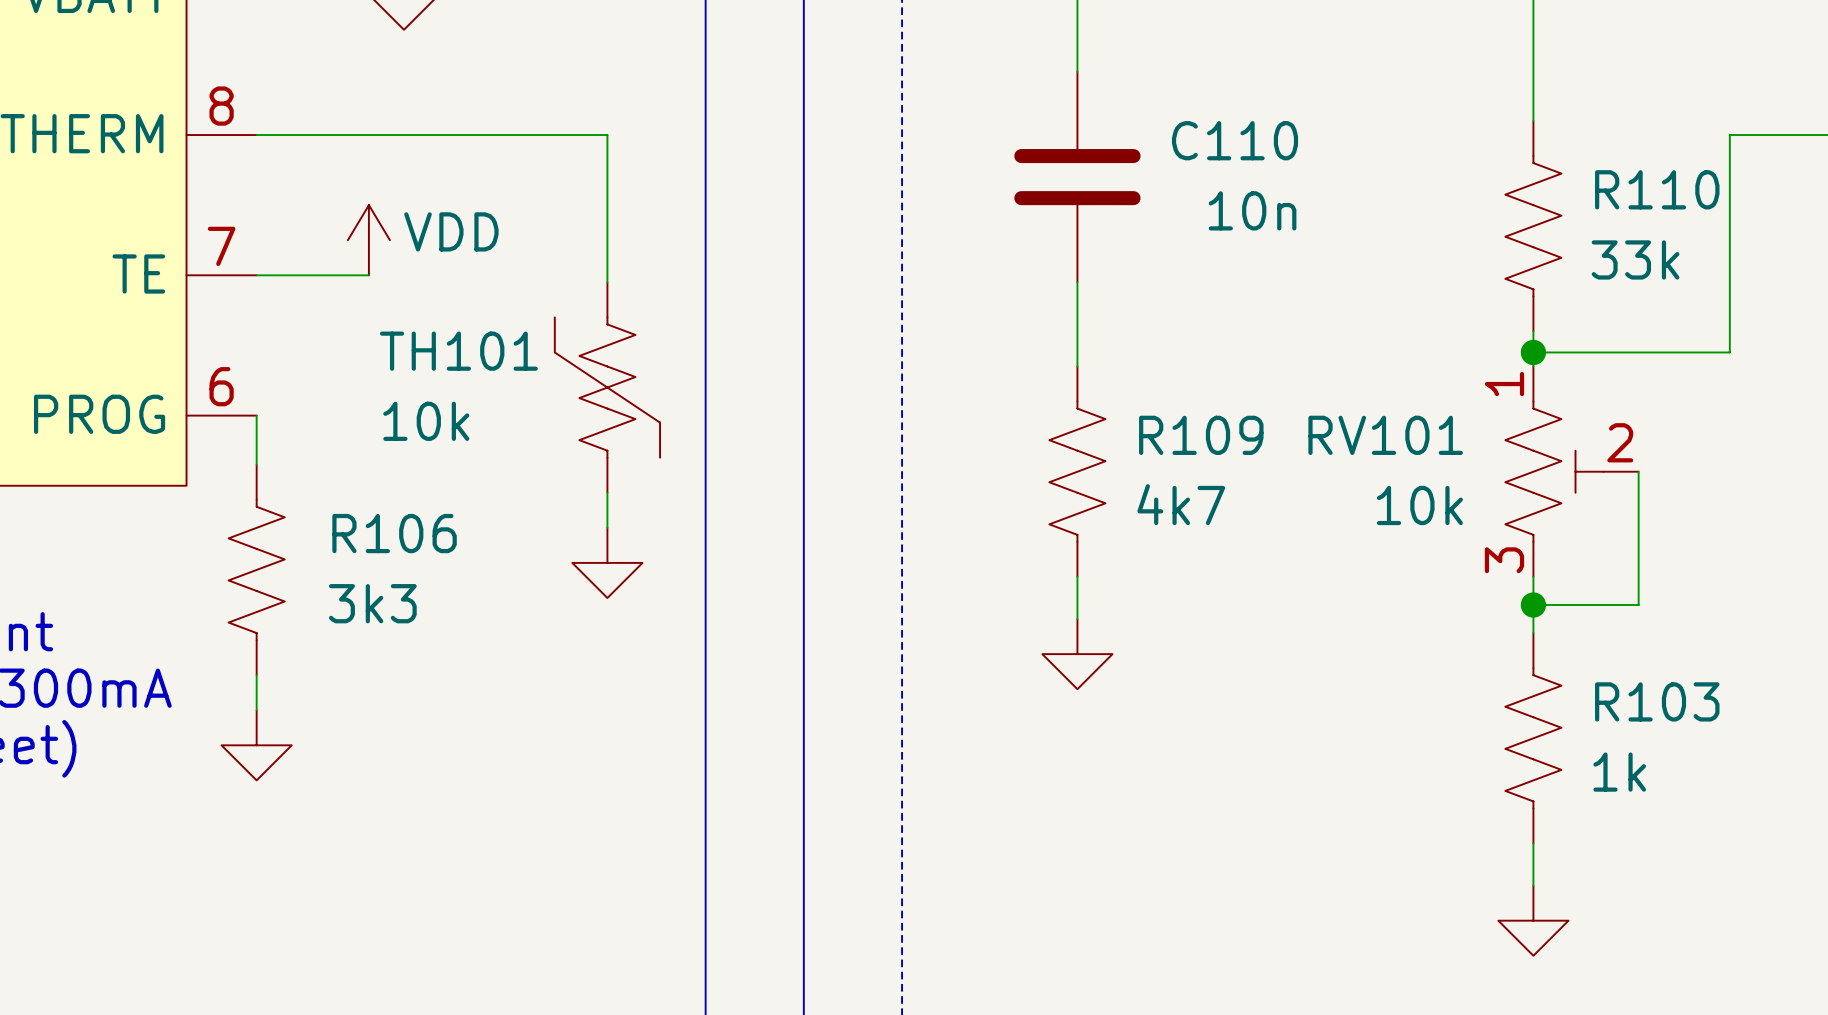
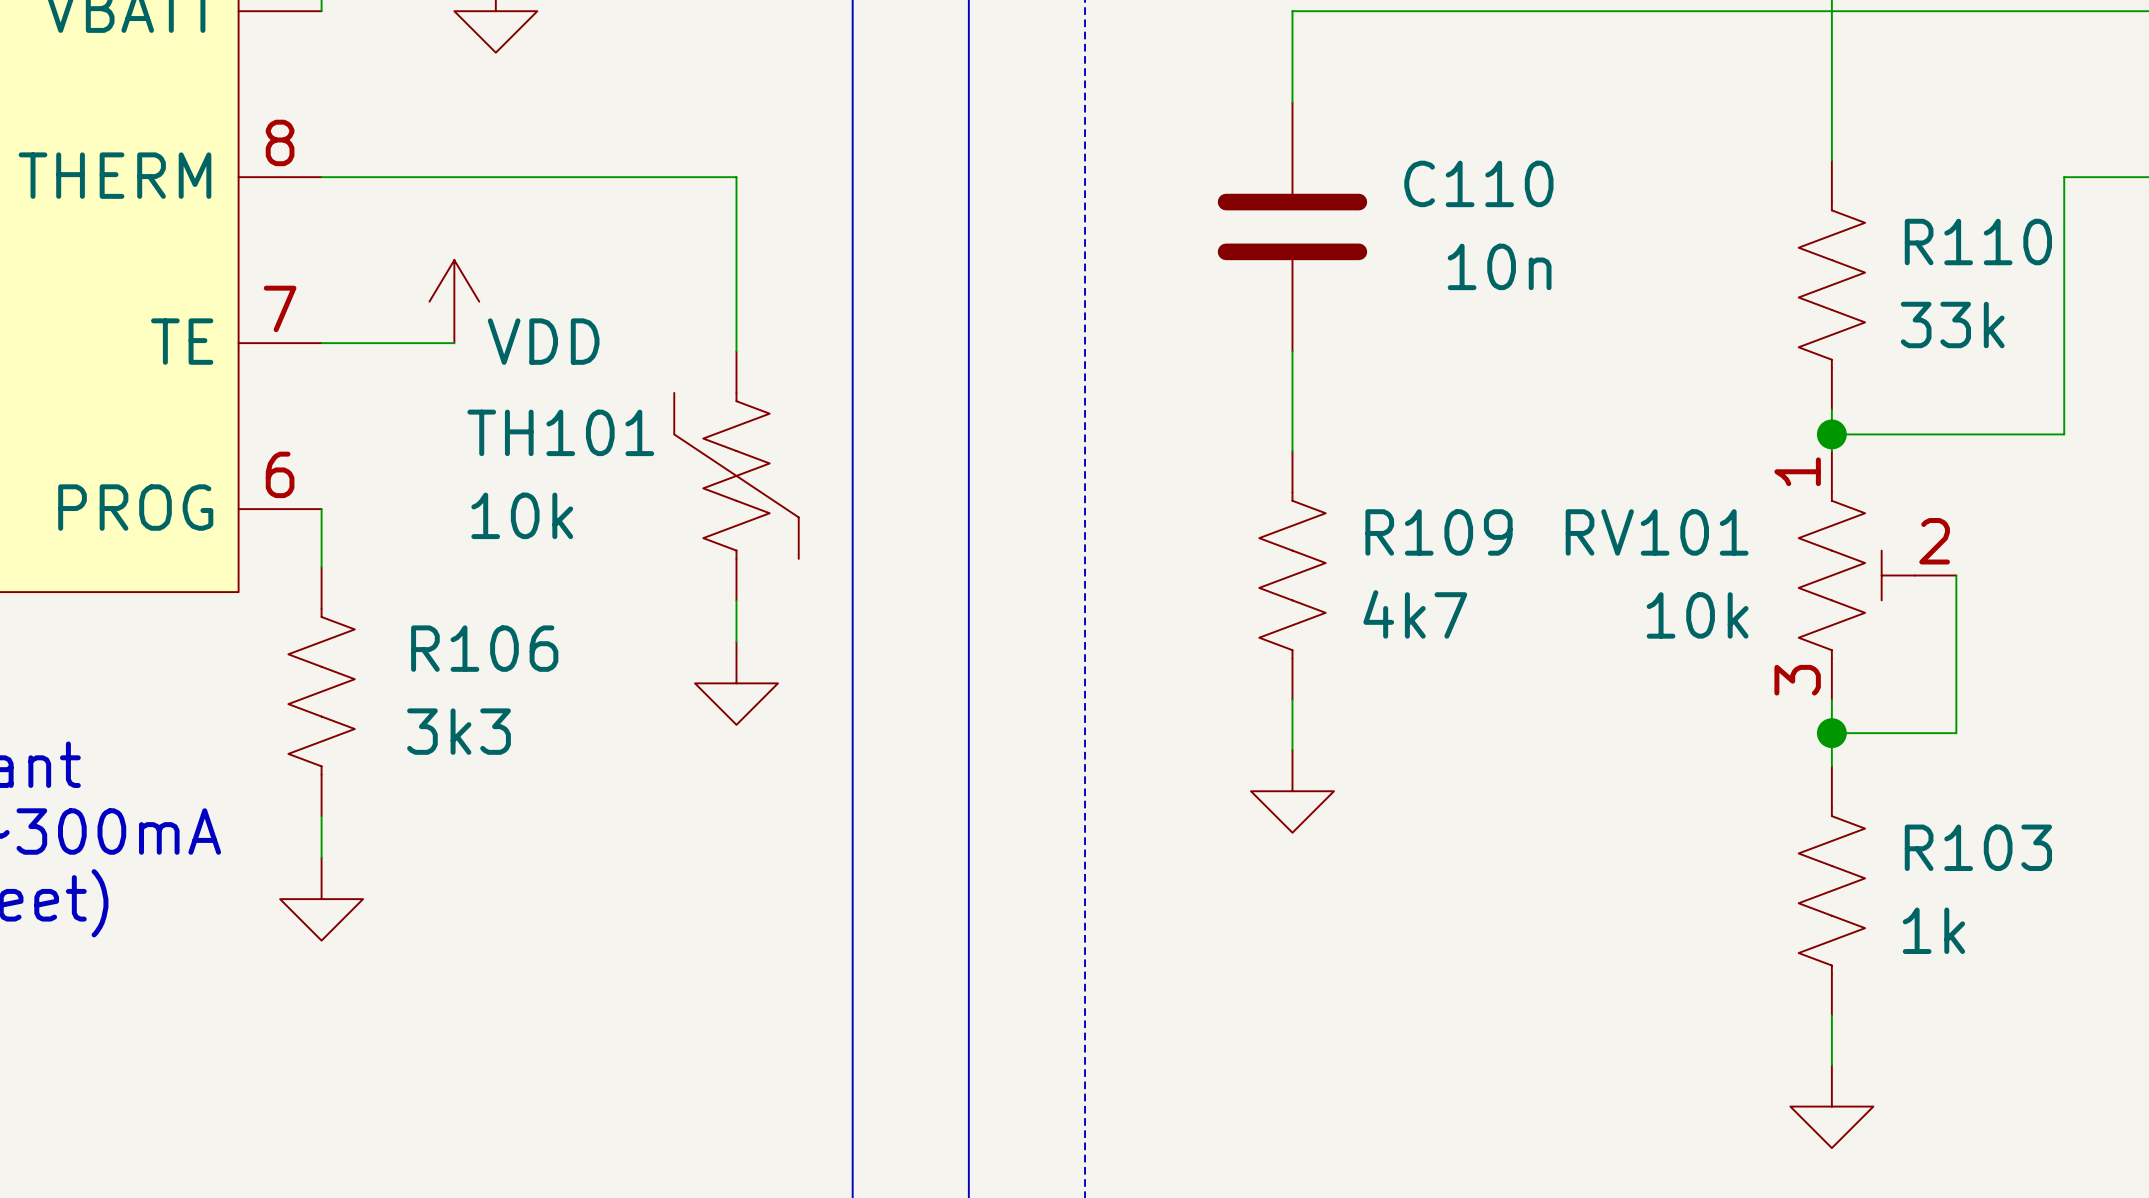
power symbol text position: VDD (451, 231) -> VDD (543, 341)

